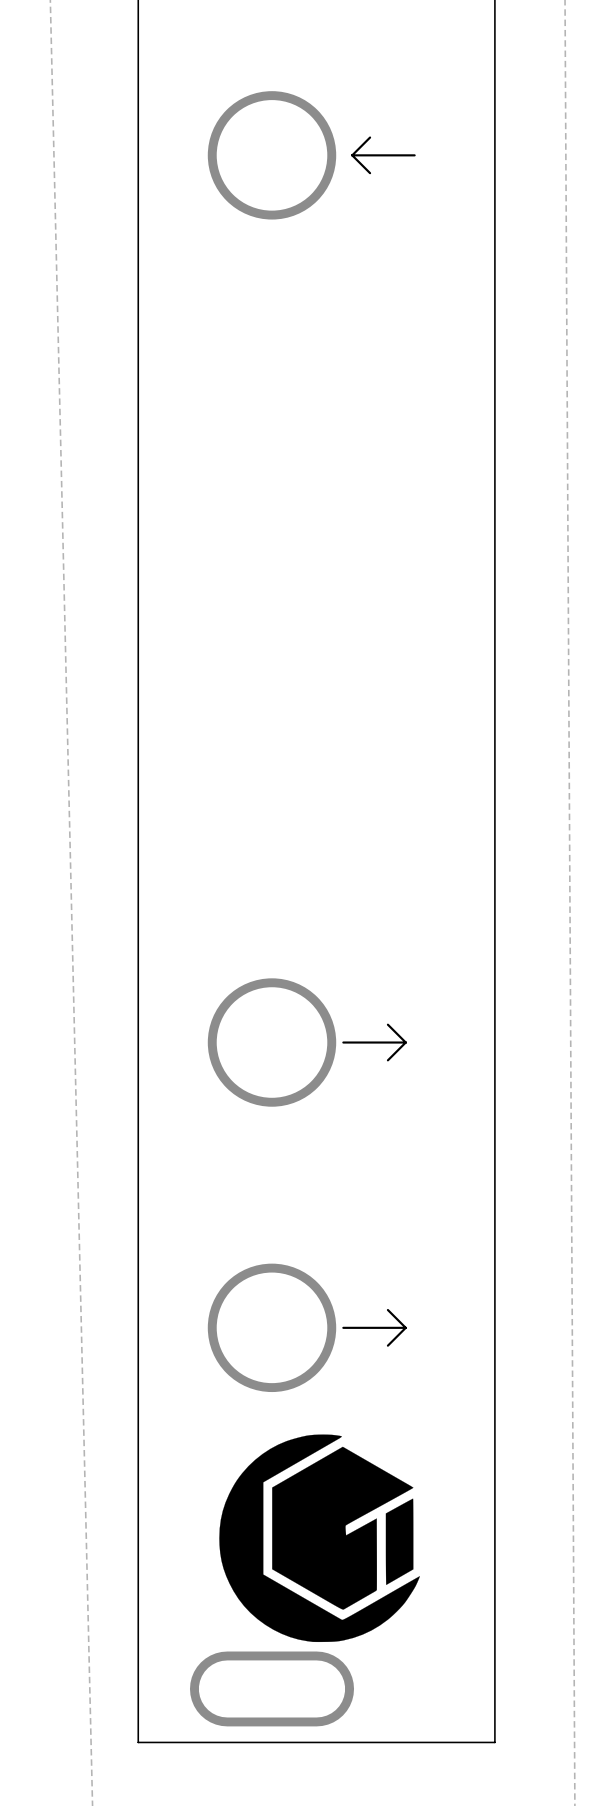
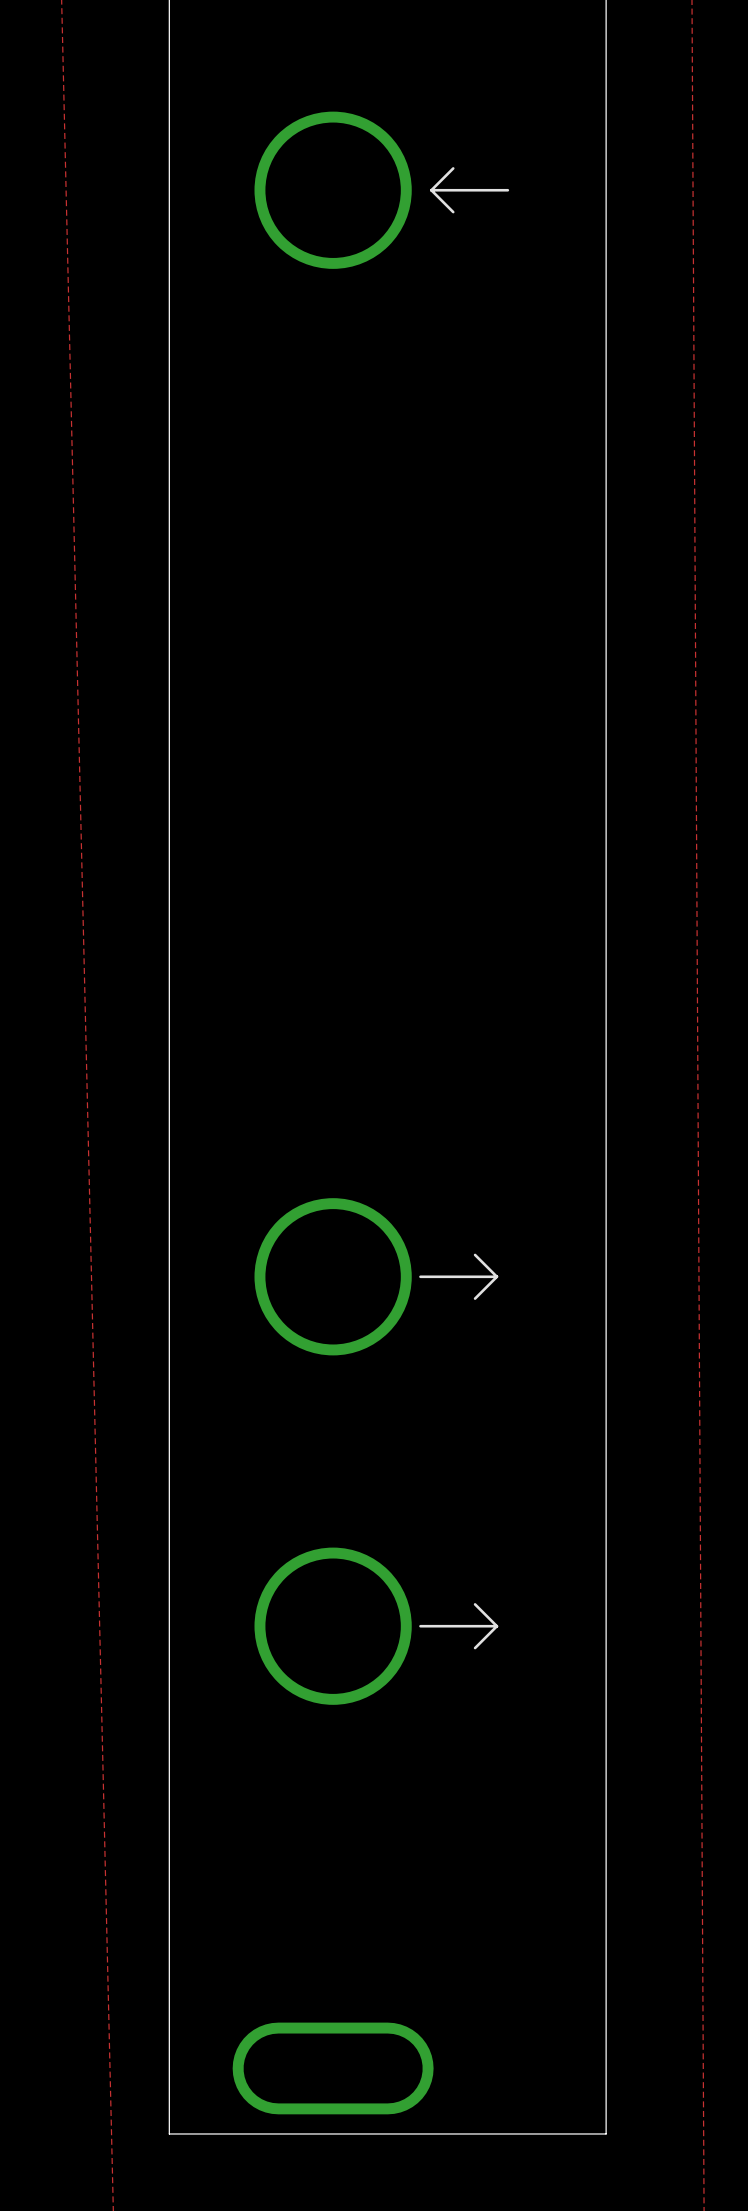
drawing: [219, 1434, 420, 1643] -> none

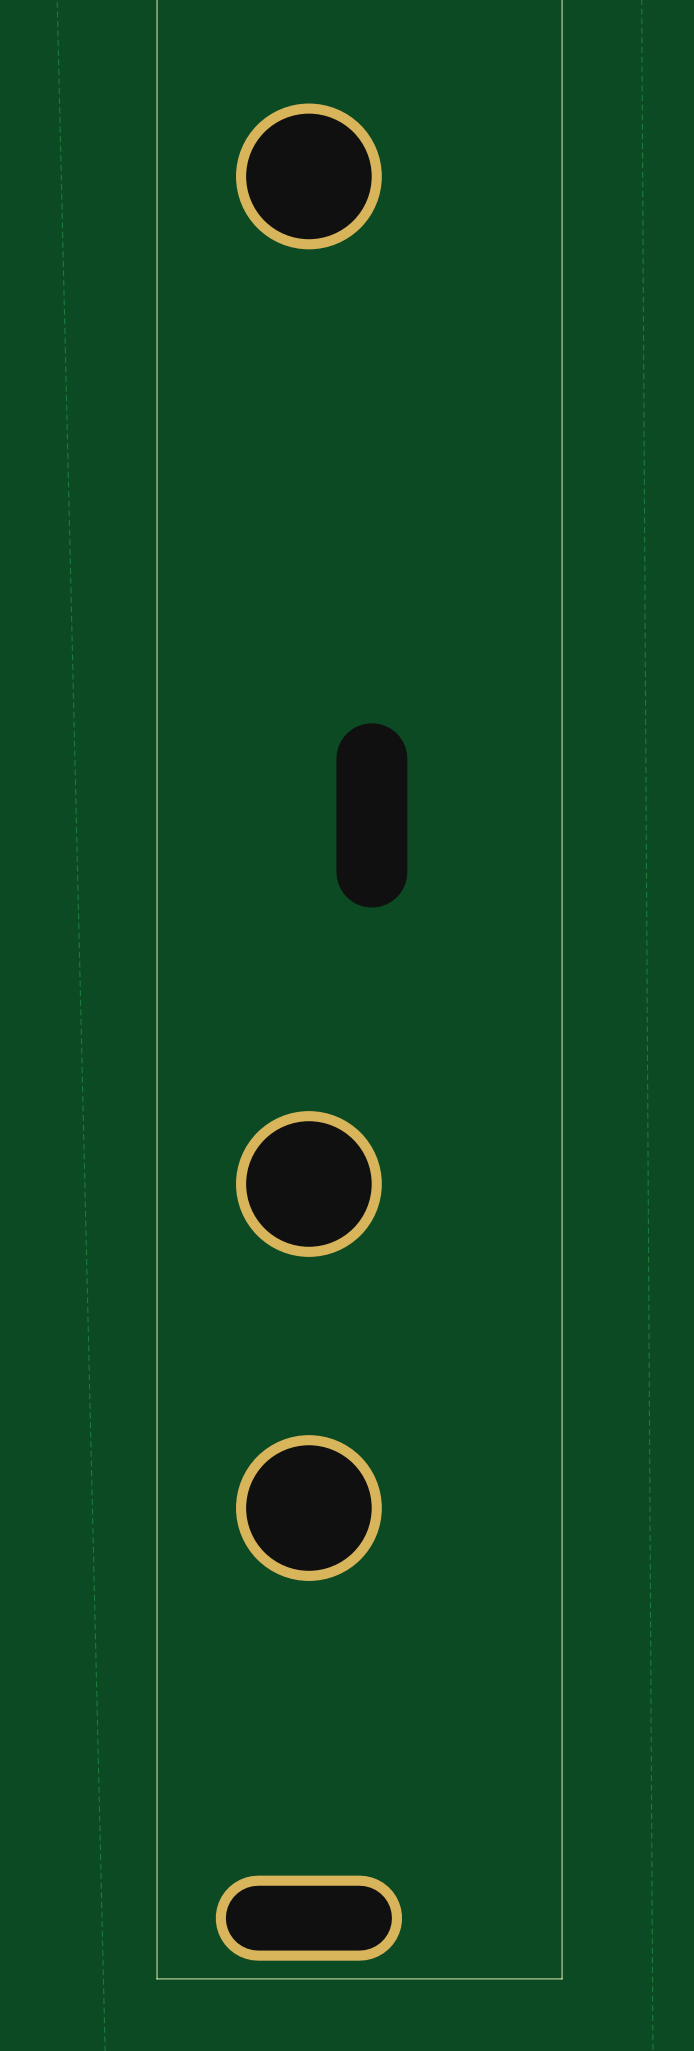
line: (453, 168) (431, 190) -> none
line: (431, 190) (453, 212) -> none
line: (431, 190) (507, 190) -> none
line: (475, 1254) (496, 1276) -> none
line: (420, 1276) (496, 1276) -> none
line: (496, 1276) (475, 1298) -> none
line: (475, 1604) (496, 1626) -> none
line: (420, 1626) (496, 1626) -> none
line: (496, 1626) (475, 1648) -> none

